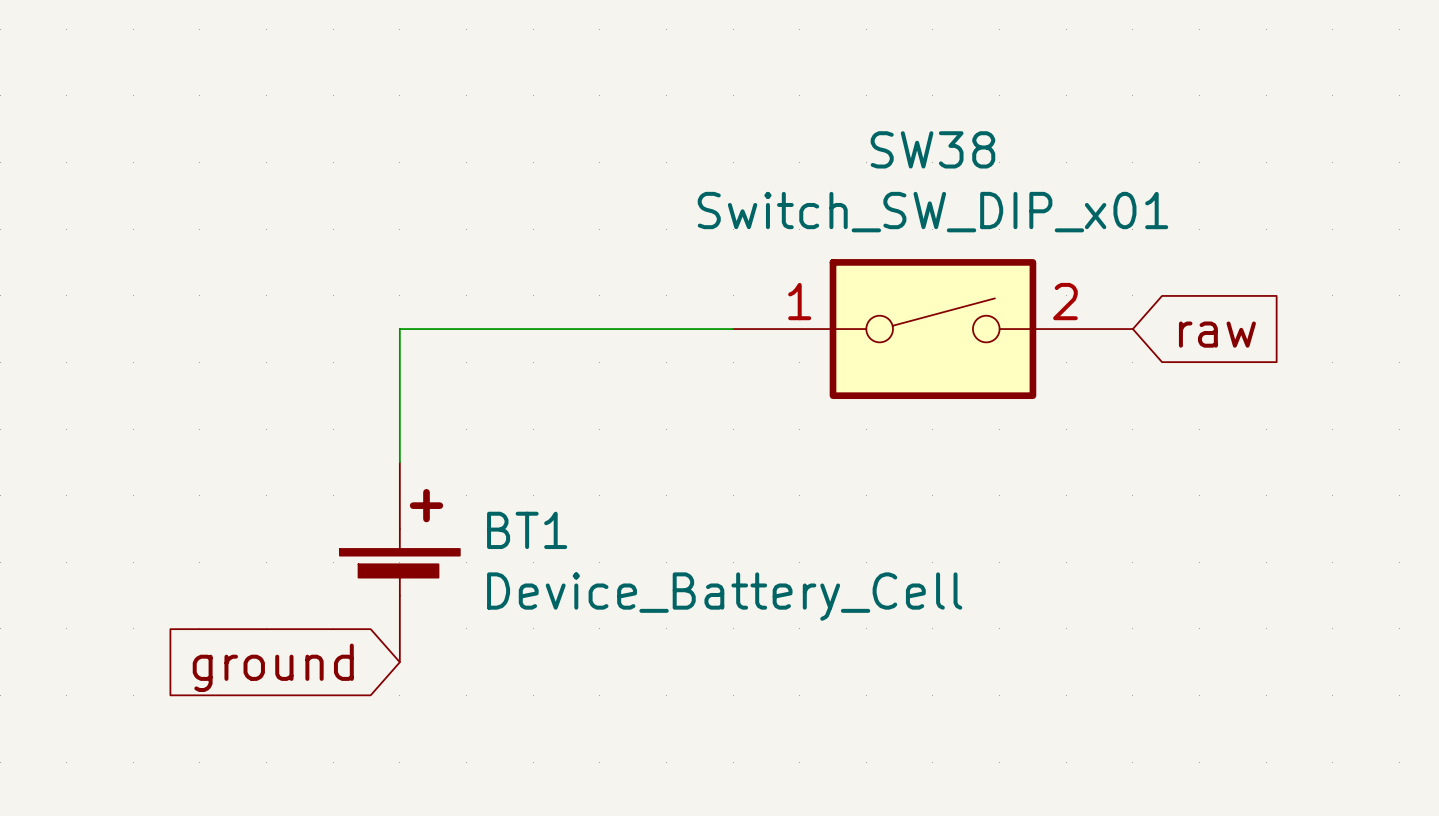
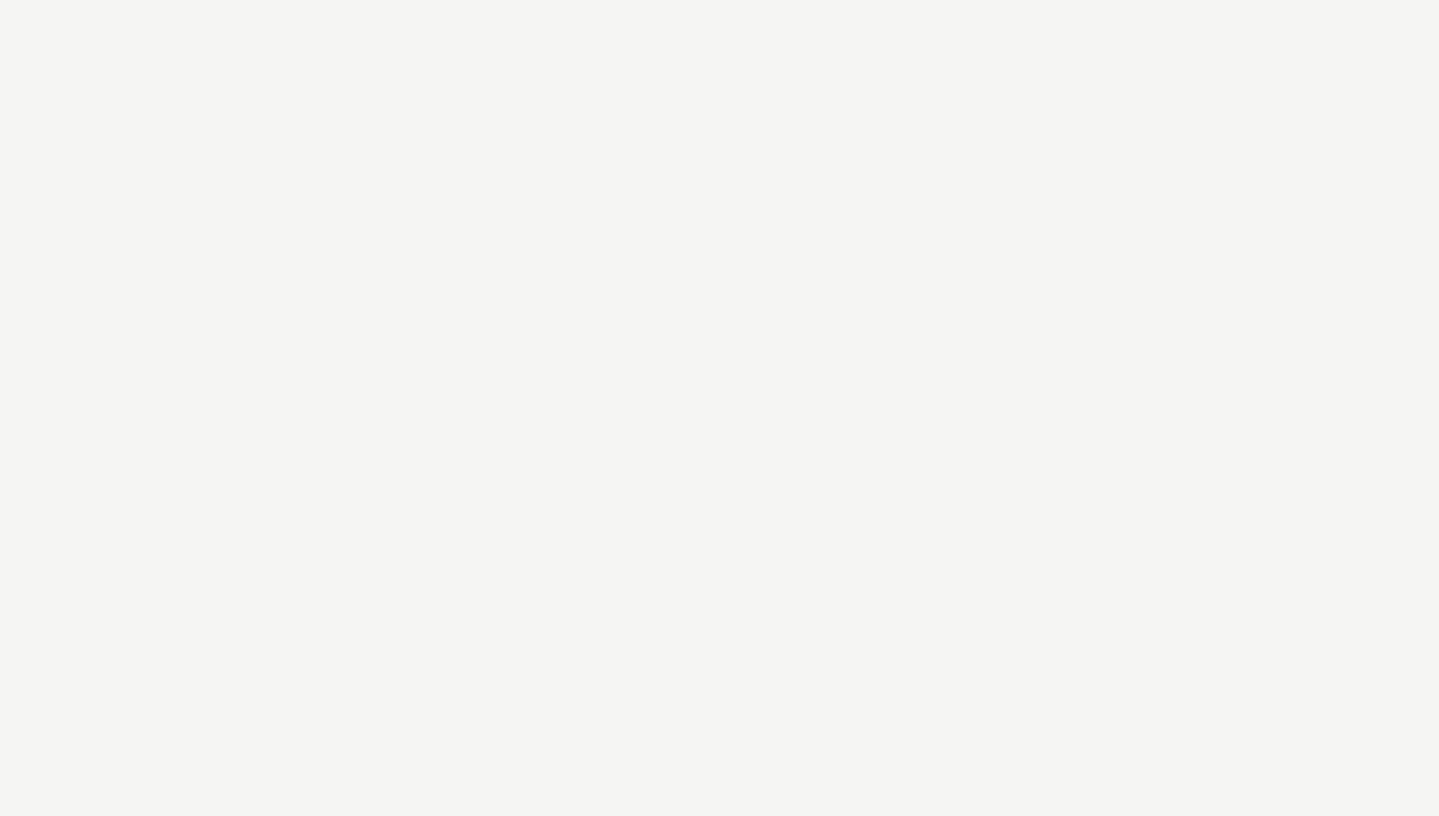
wire: (733, 329) (399, 329) (399, 462) -> none
SW38: Switch_SW_DIP_x01 (932, 329) -> none
global label: raw (1217, 334) -> none
BT1: Device_Battery_Cell (399, 562) -> none
global label: ground (273, 667) -> none

